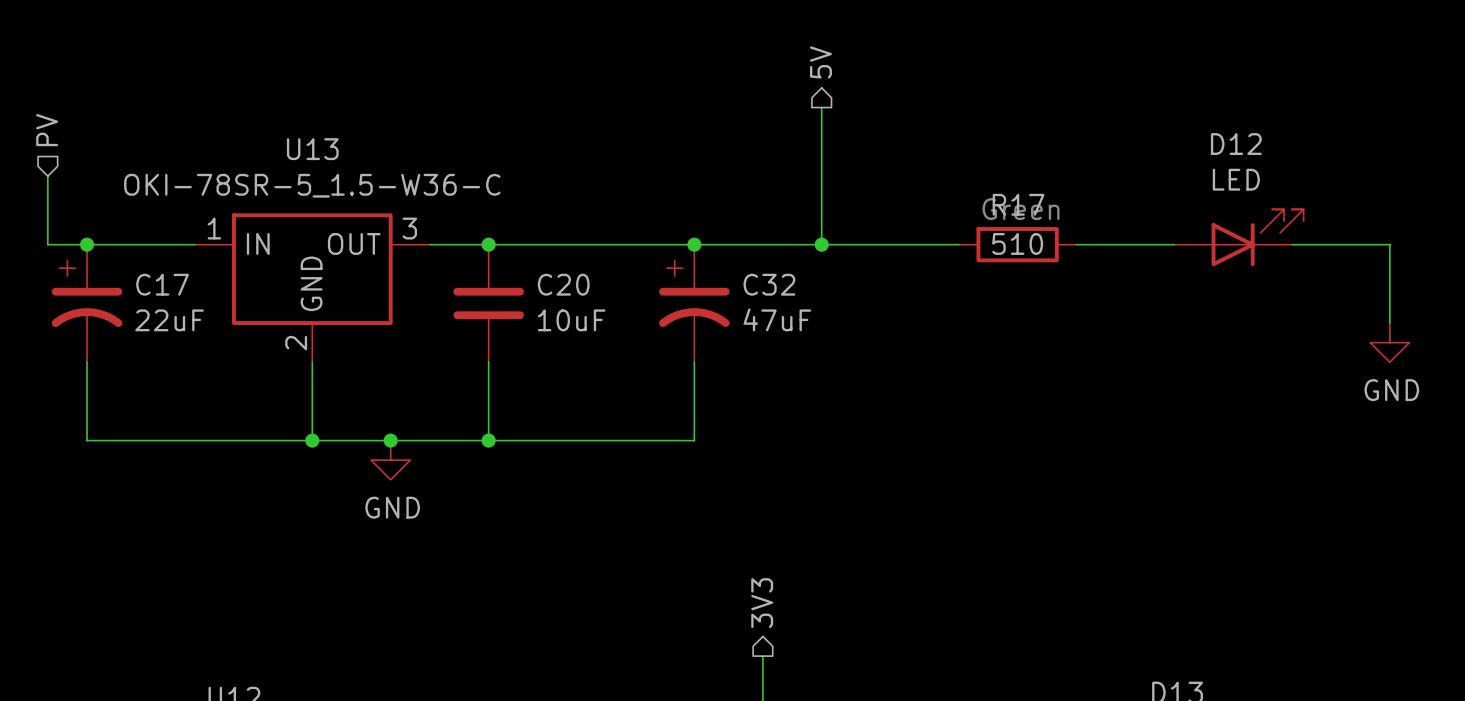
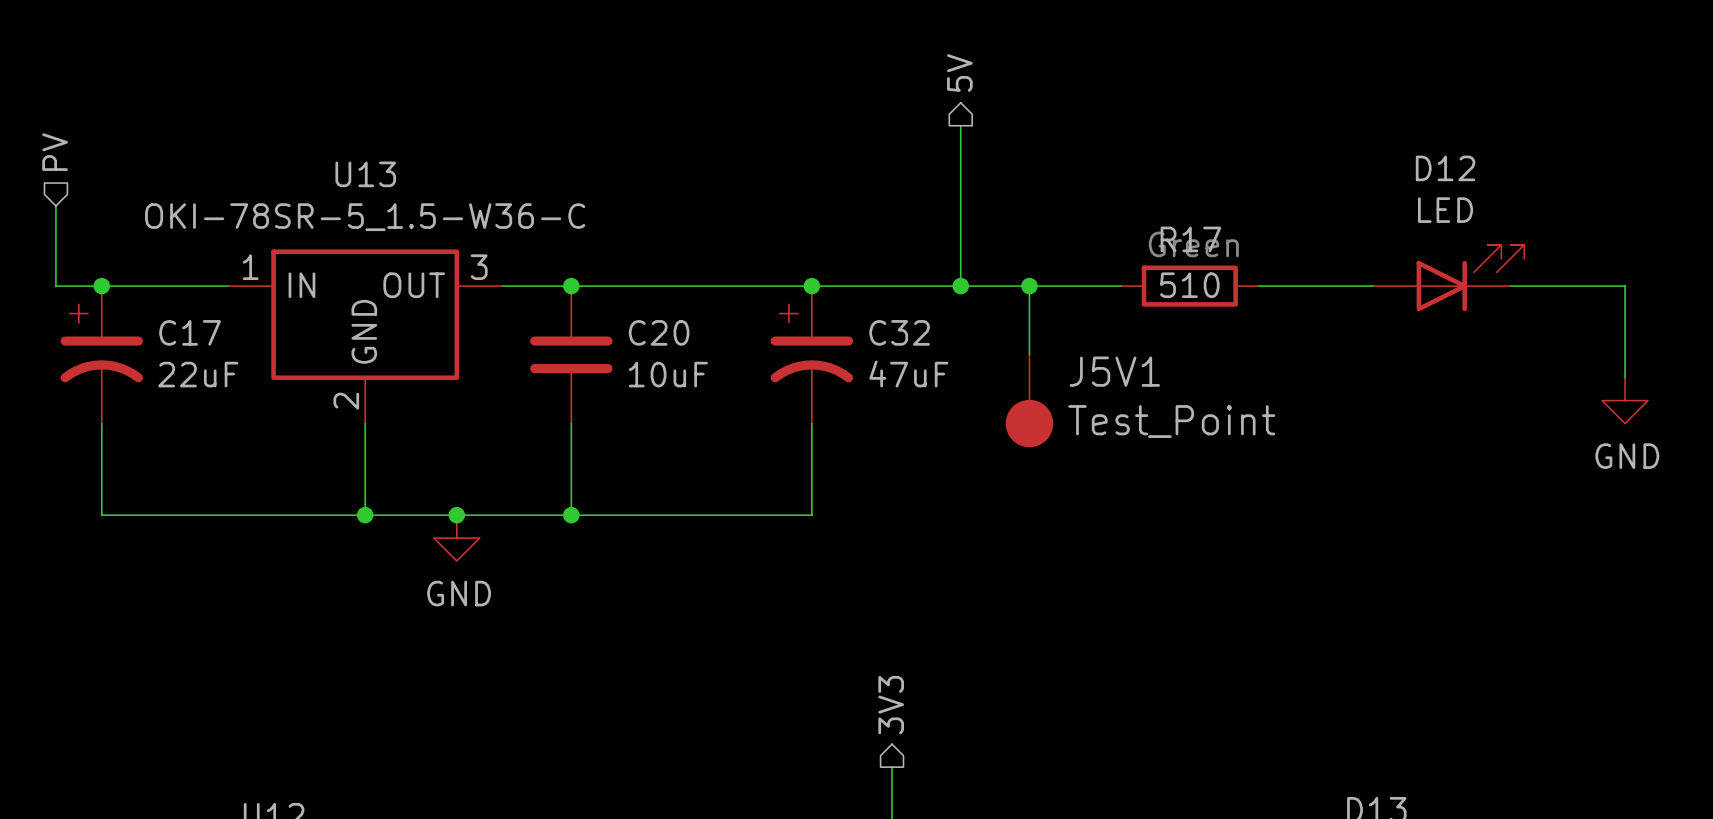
wire: none -> (1029, 286) (1029, 354)
junction: none -> (1029, 286)
J5V1: none -> Test_Point (1029, 400)

